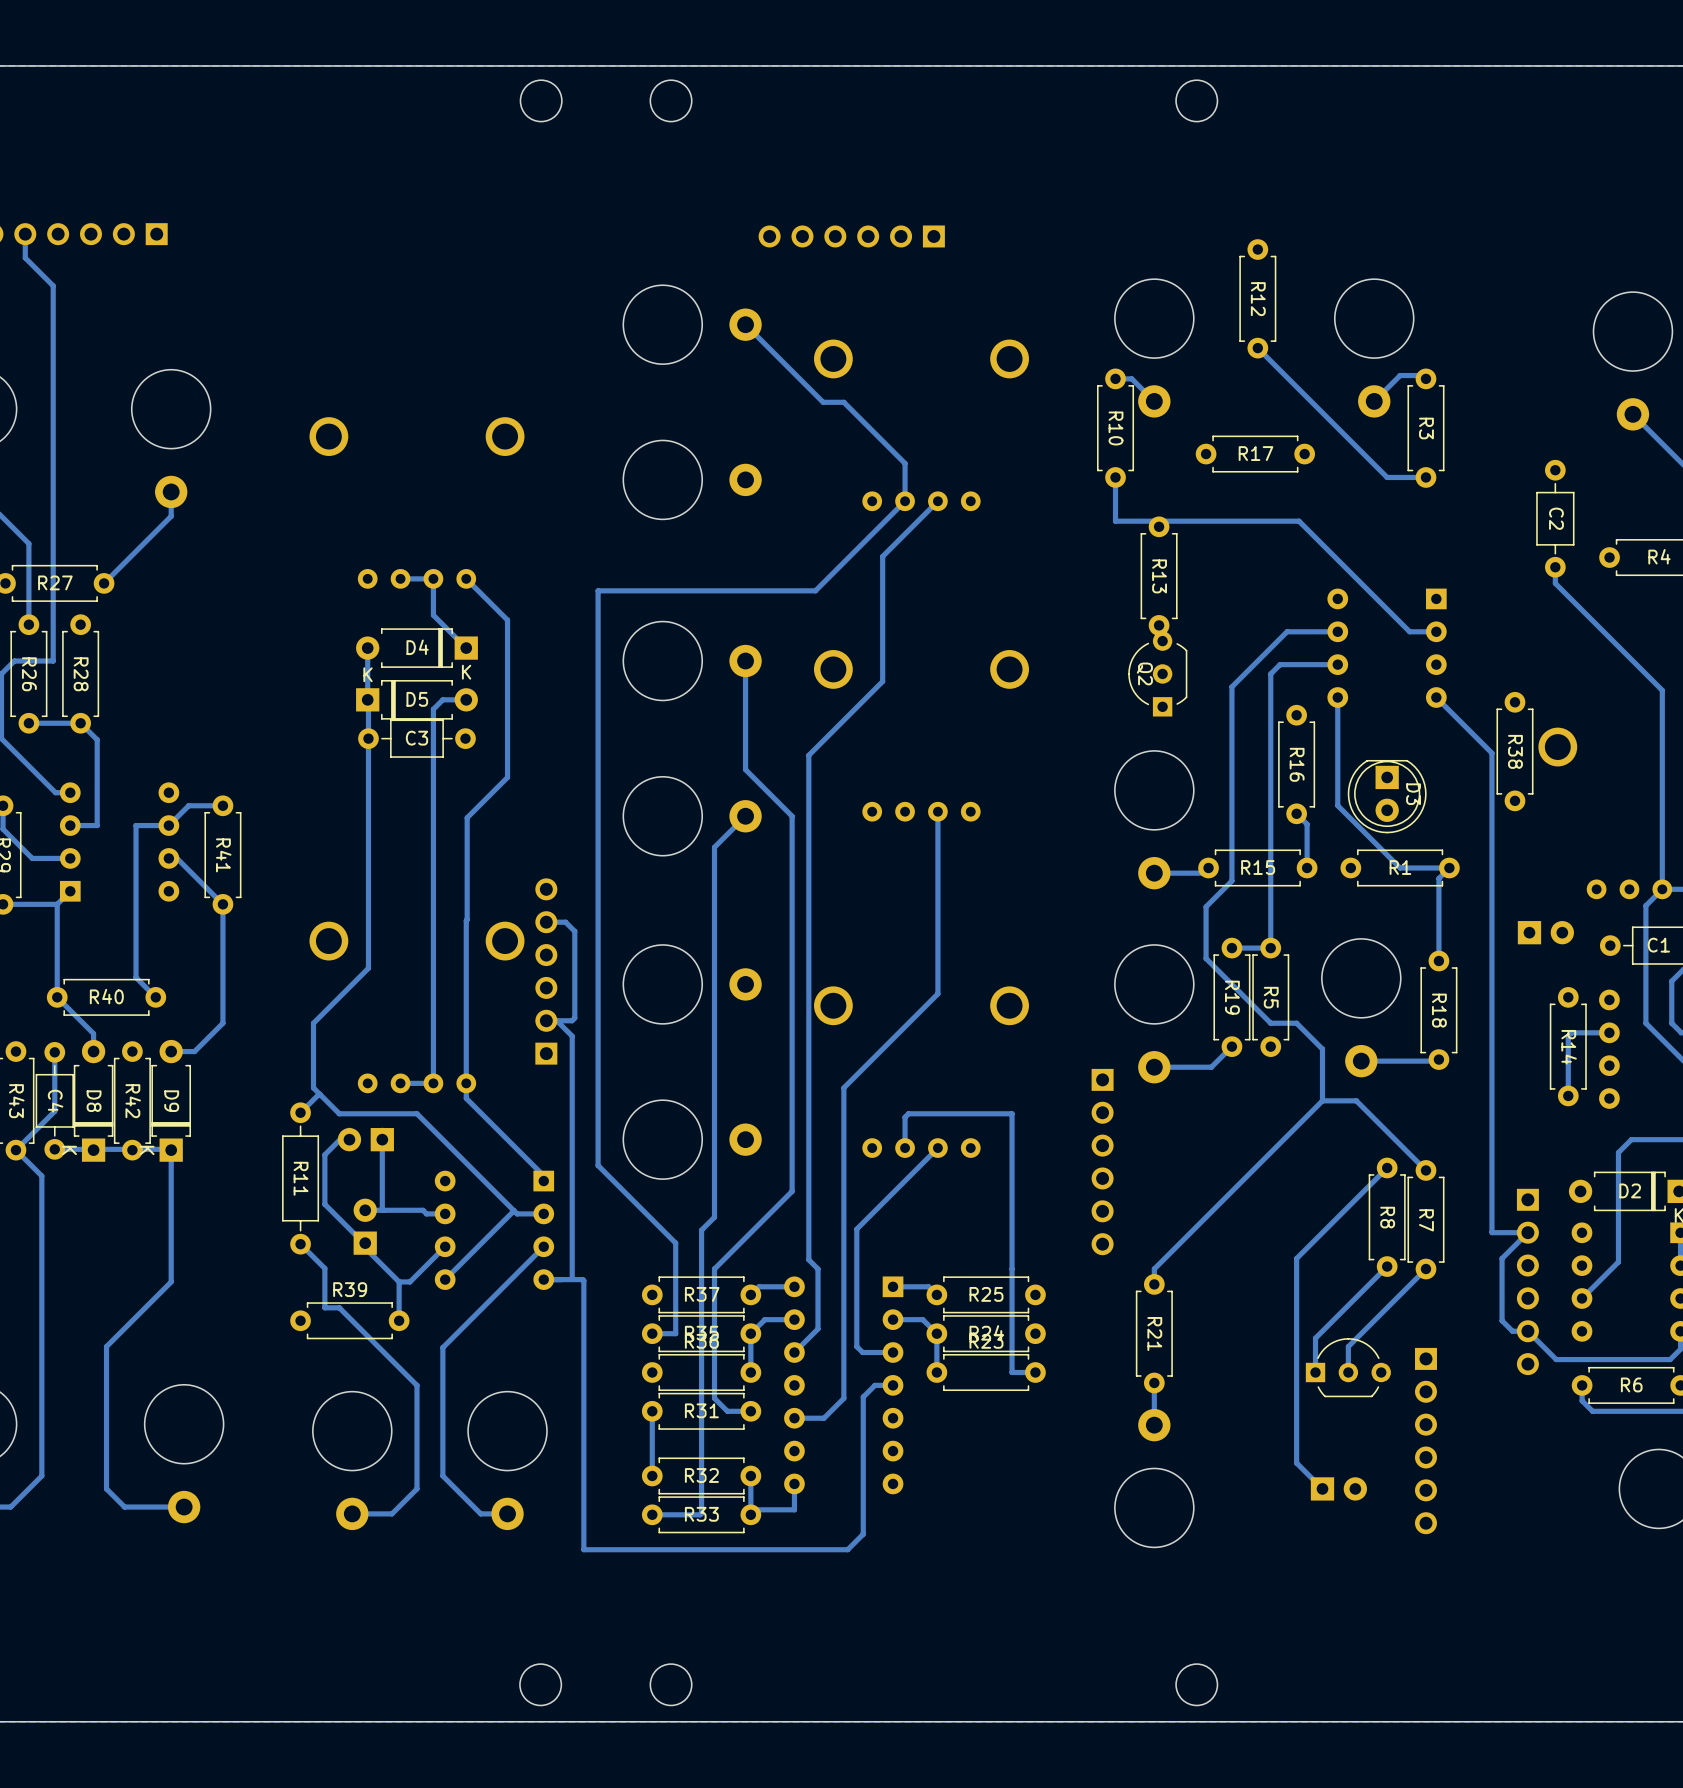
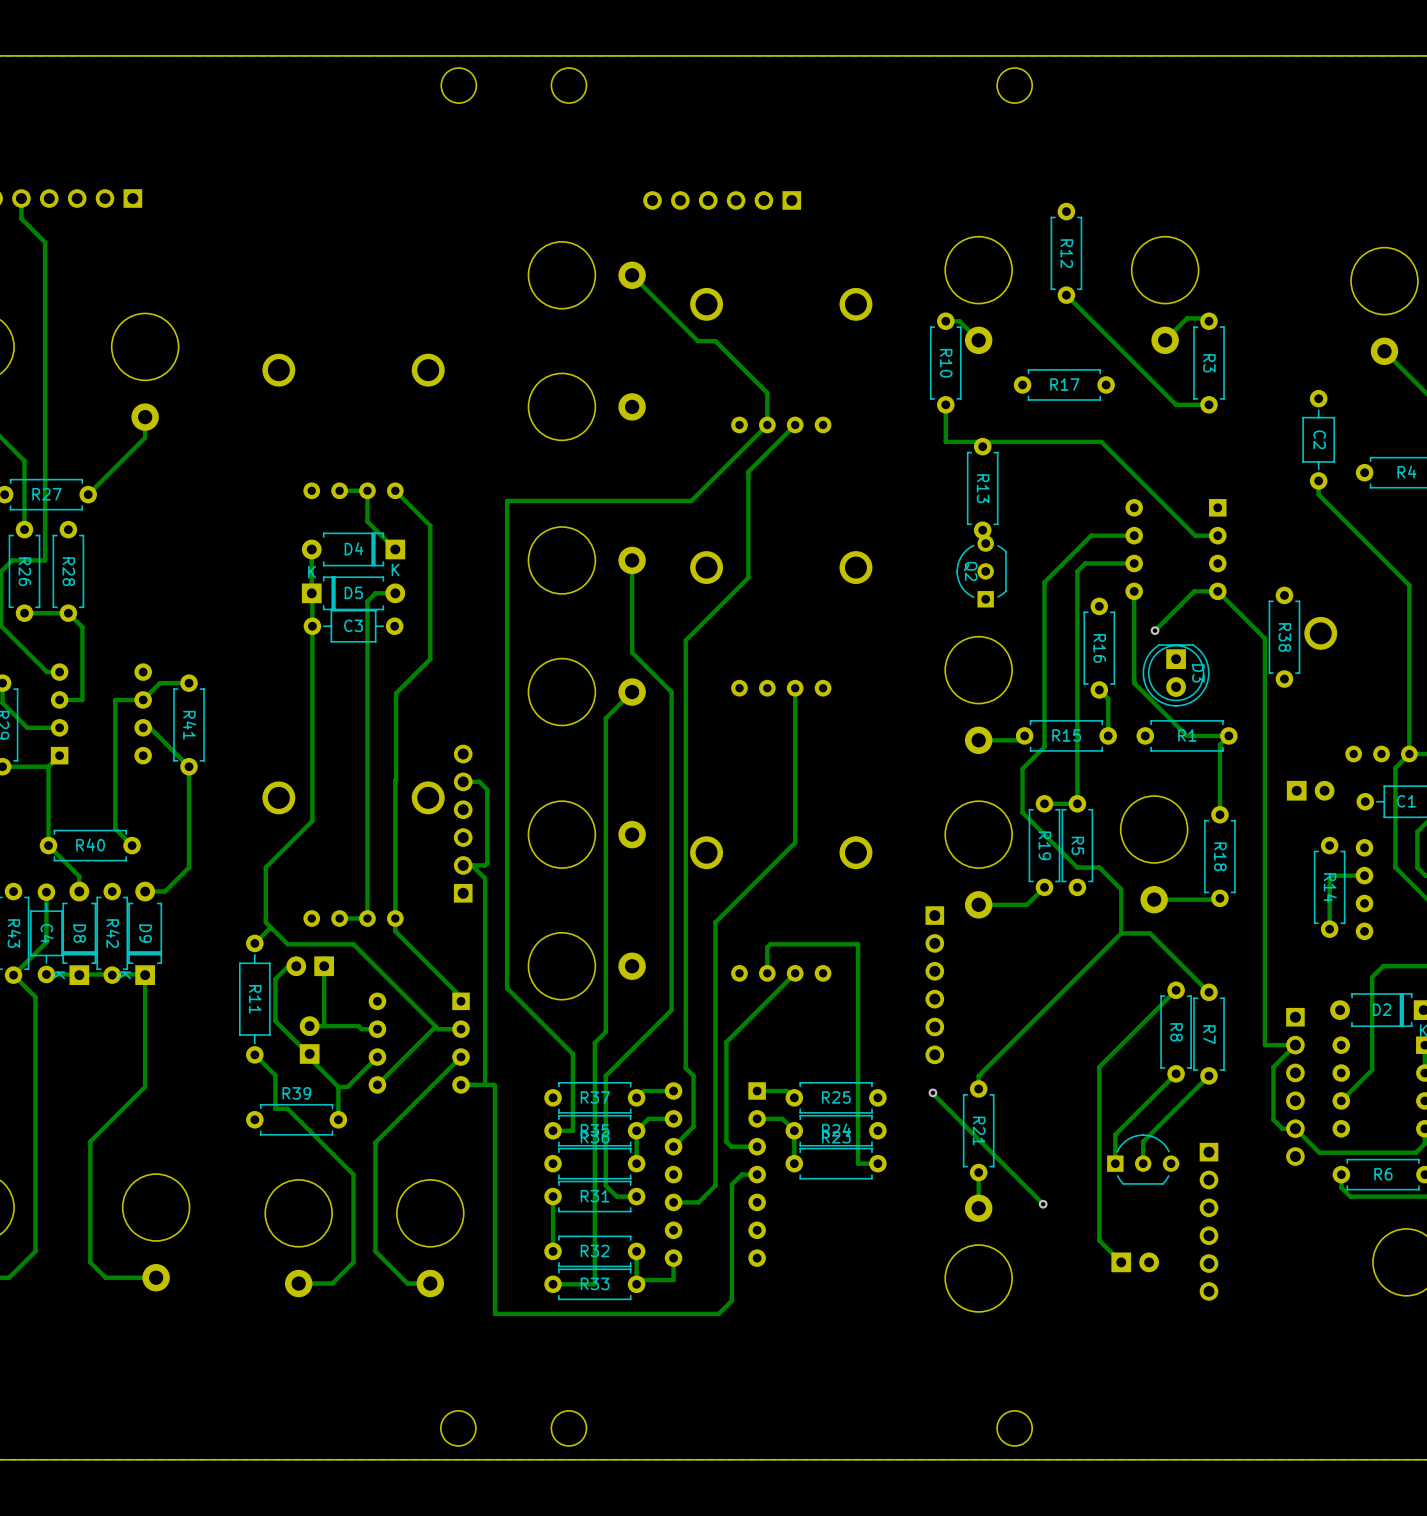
track: none -> (1217, 591) (1194, 591) (1155, 630)
via: none -> (1155, 630)
via: none -> (932, 1092)
track: none -> (932, 1093) (1043, 1204)
via: none -> (1043, 1204)

